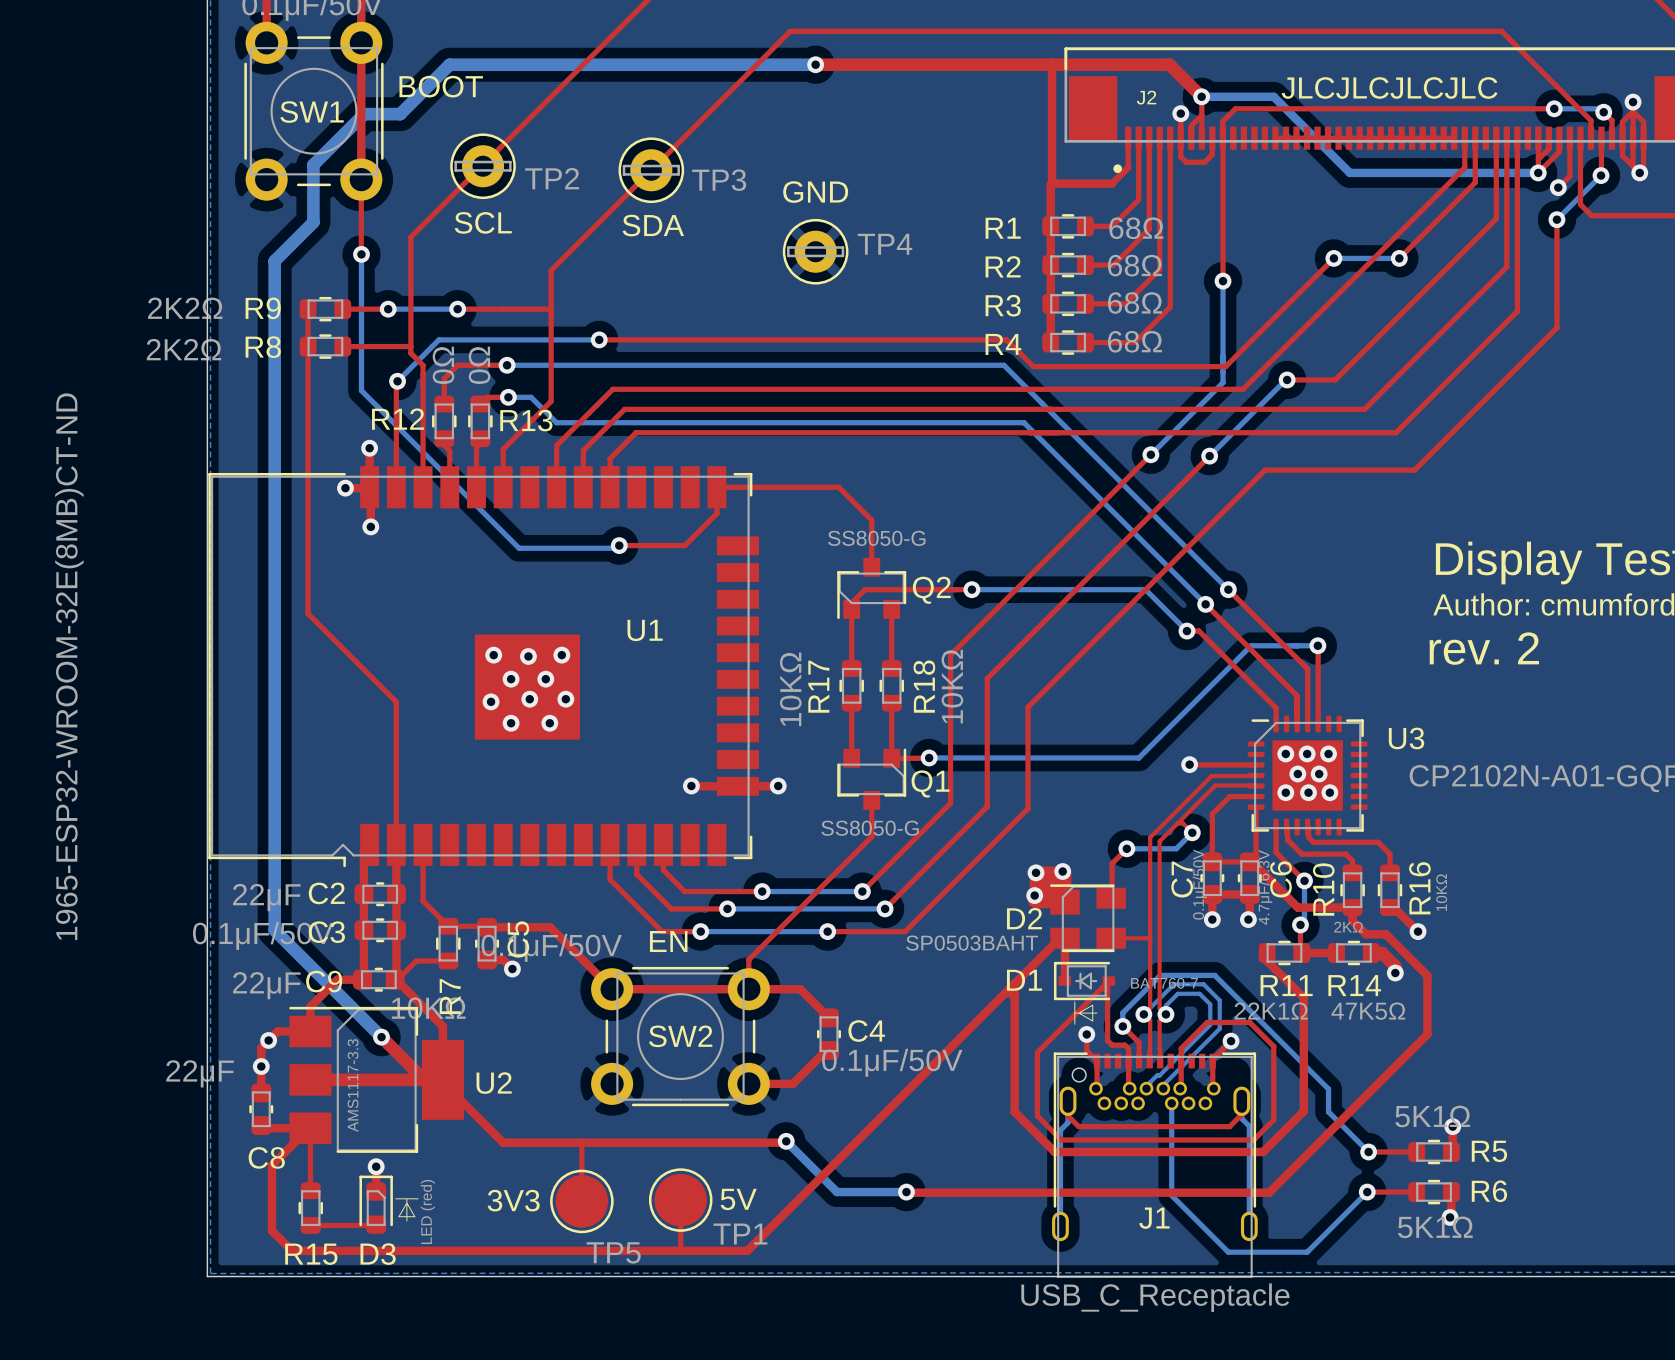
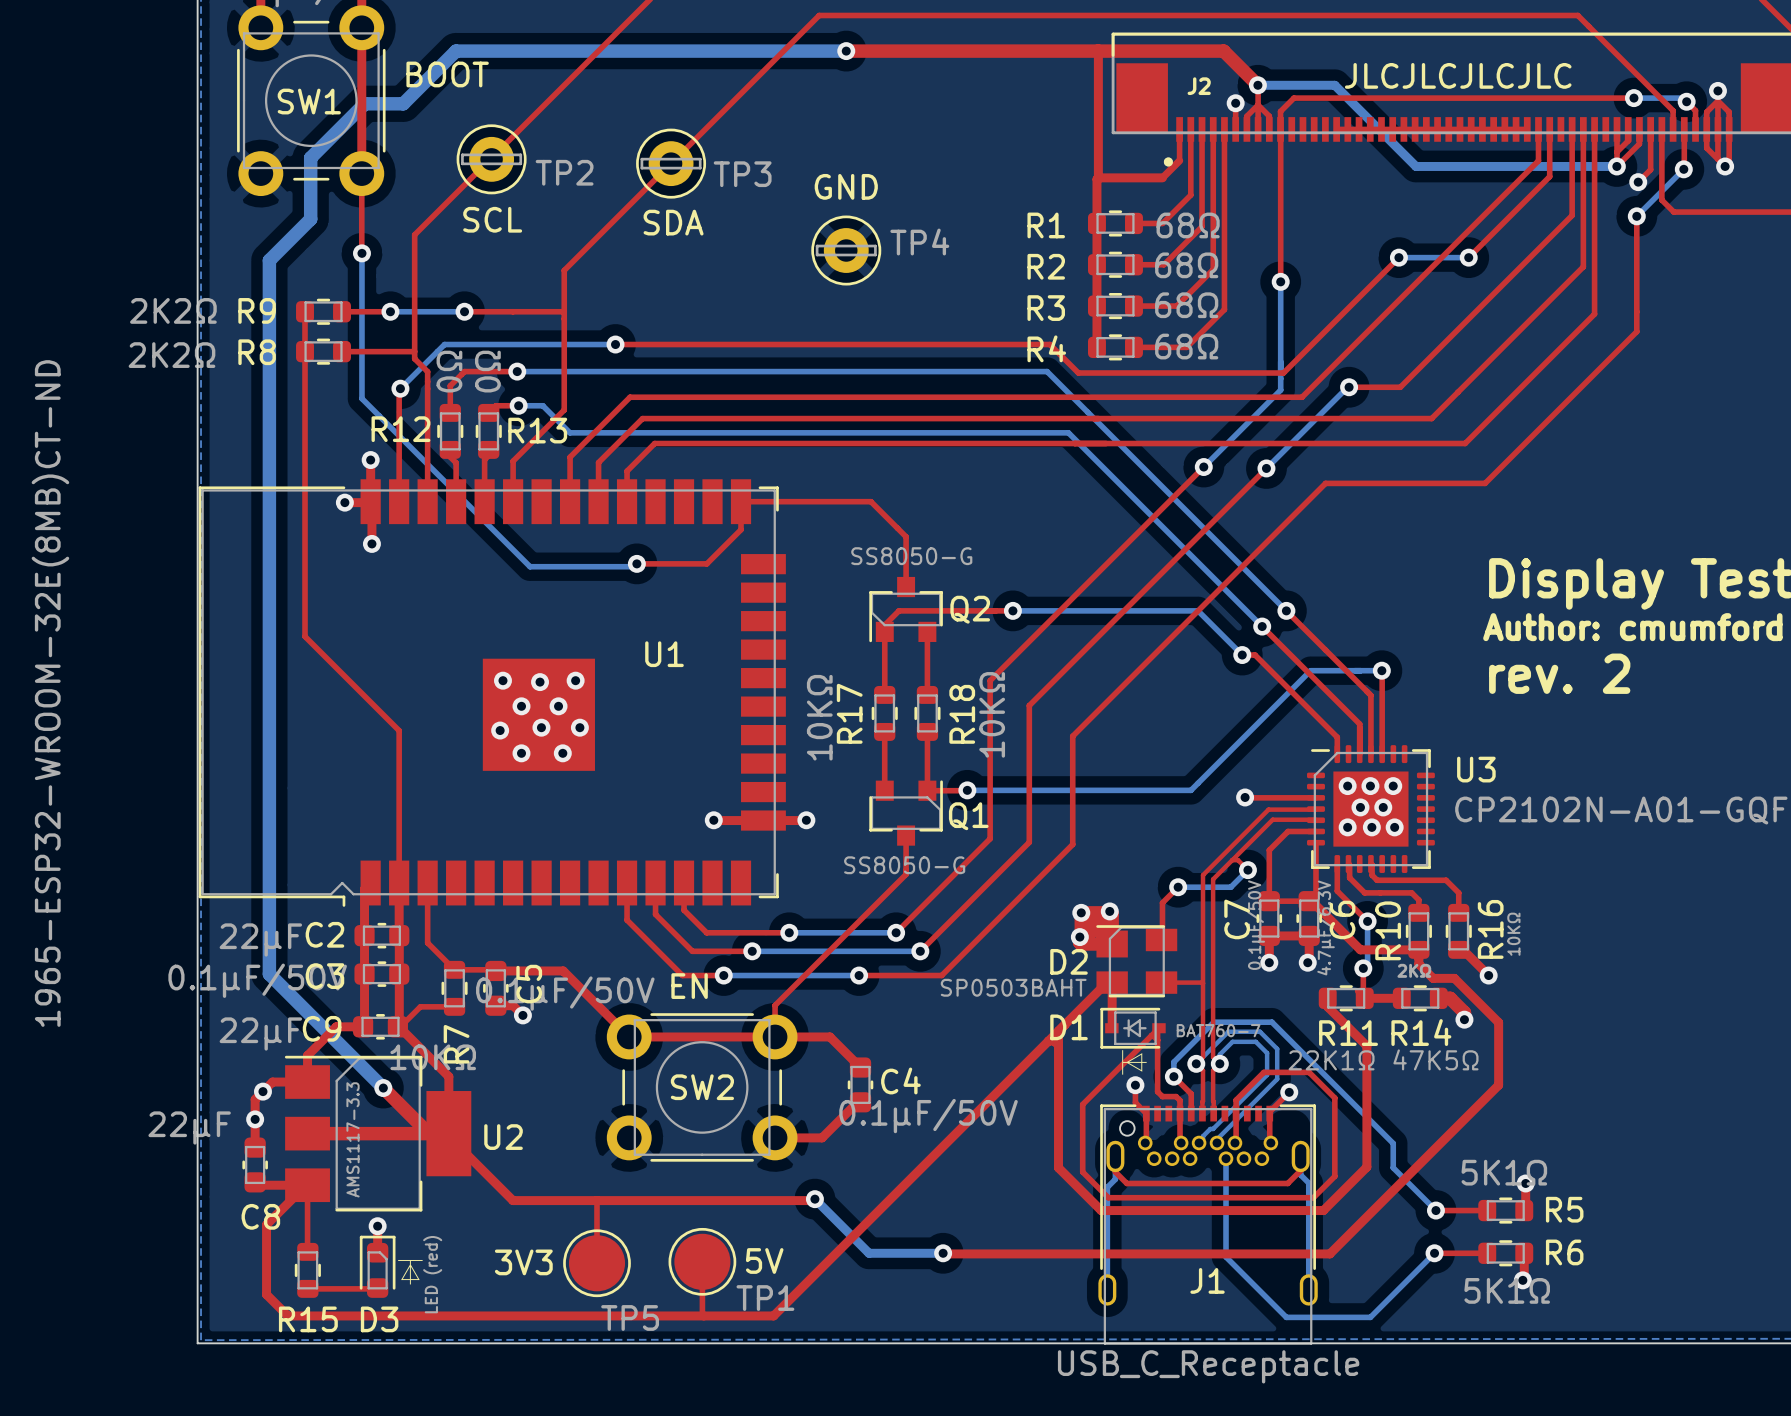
top track: (1180, 138) (1180, 156) (1186, 162) (1204, 162) (1212, 154) (1212, 138) -> (1258, 105) (1269, 116) (1269, 129)

